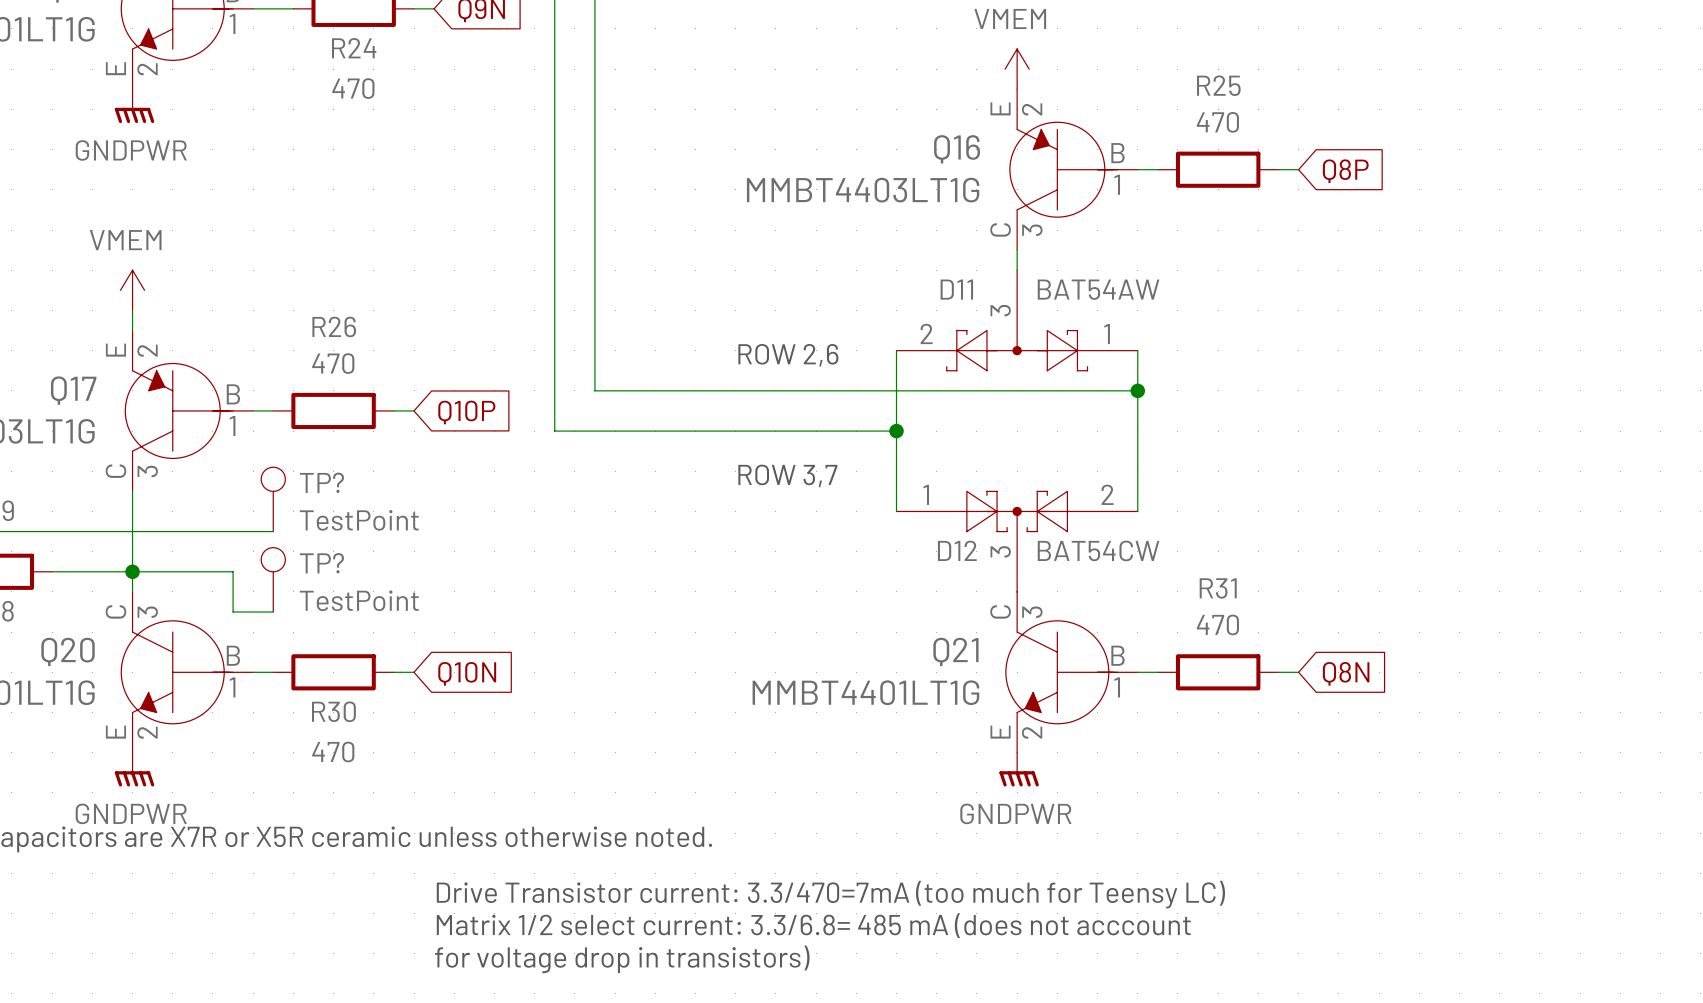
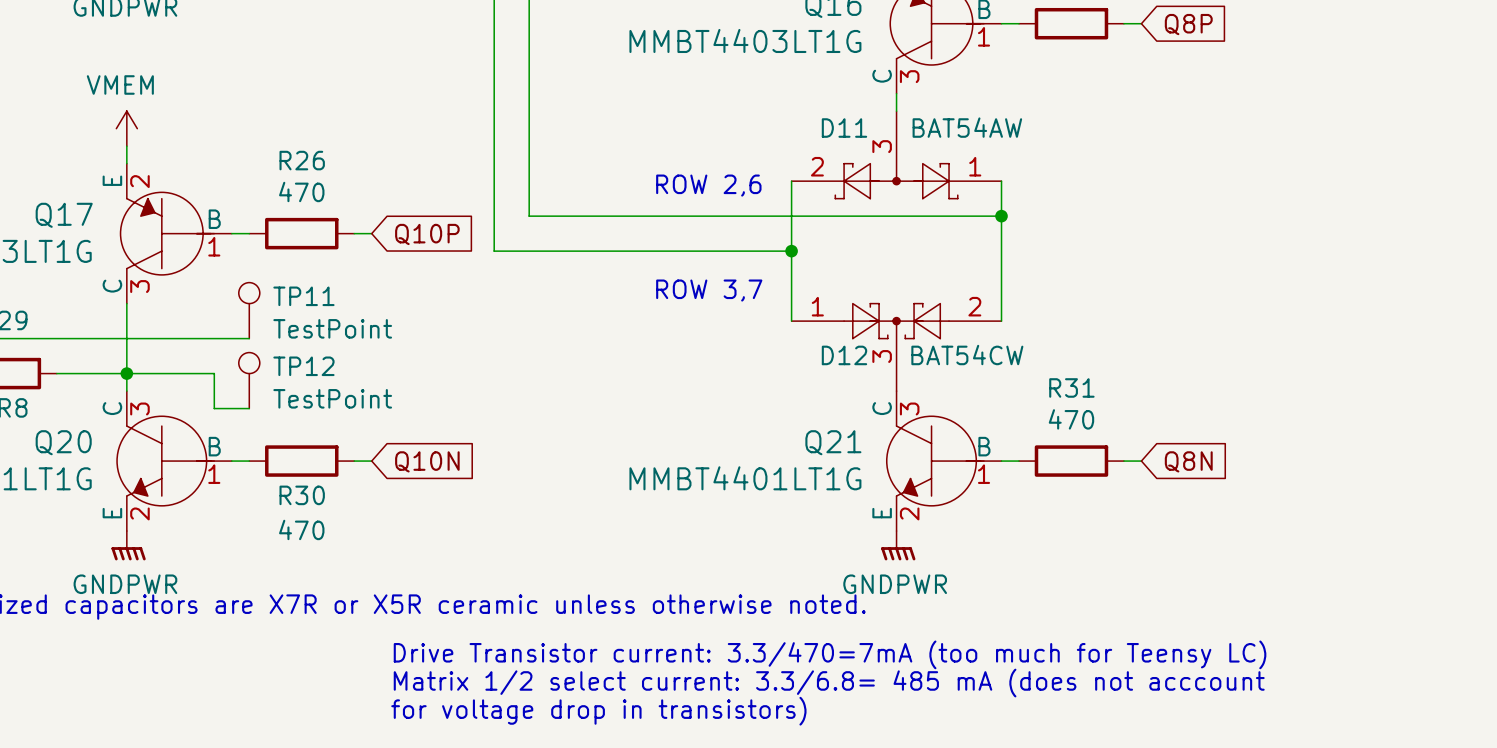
TP? name: TP? (321, 482) -> TP11 (303, 296)
TP? name: TP? (321, 563) -> TP12 (303, 366)

